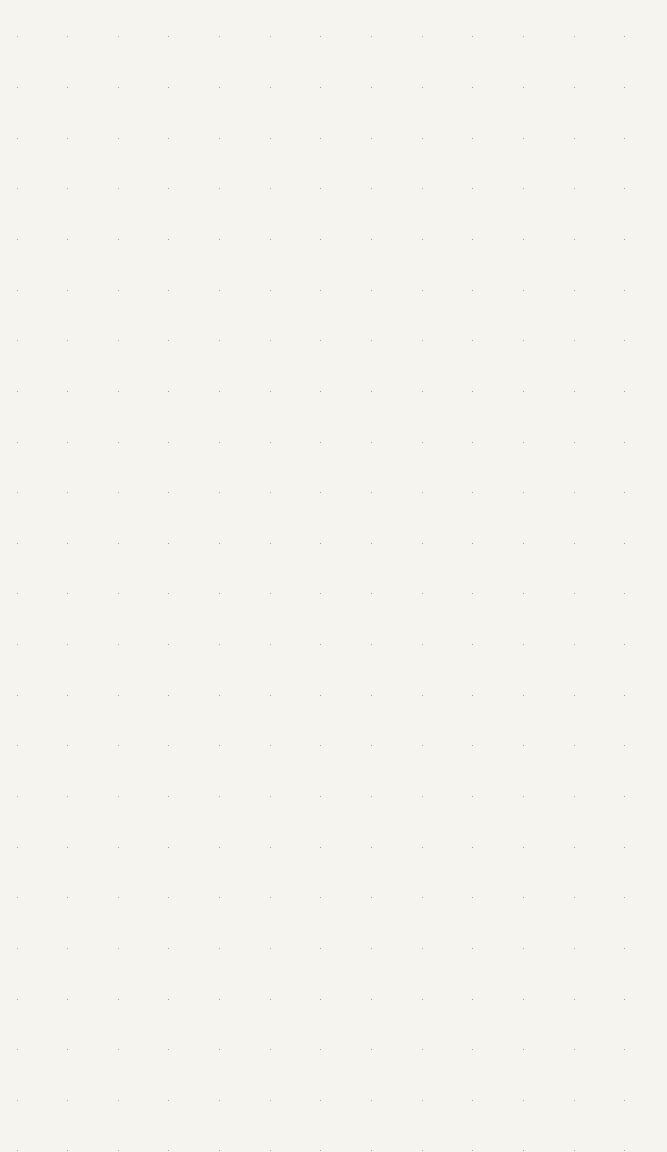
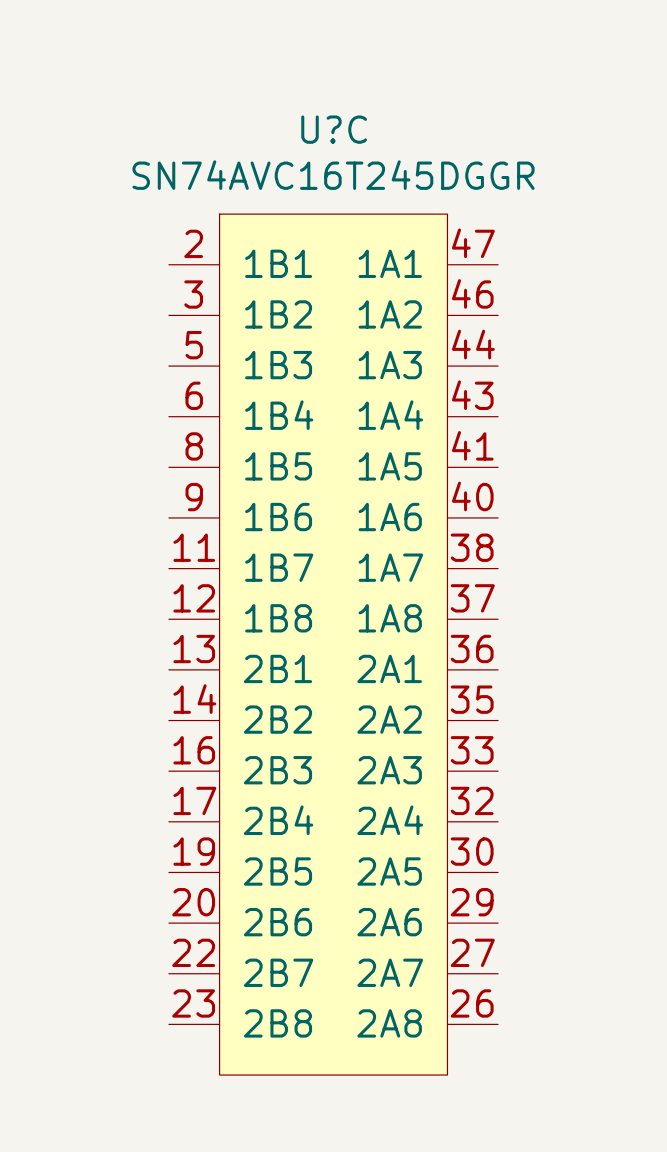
U?C: none -> SN74AVC16T245DGGR (333, 644)

